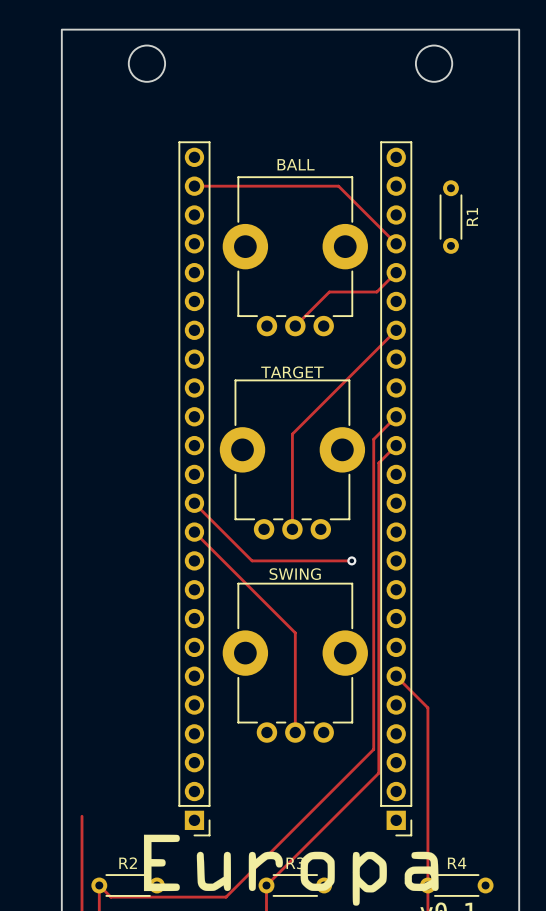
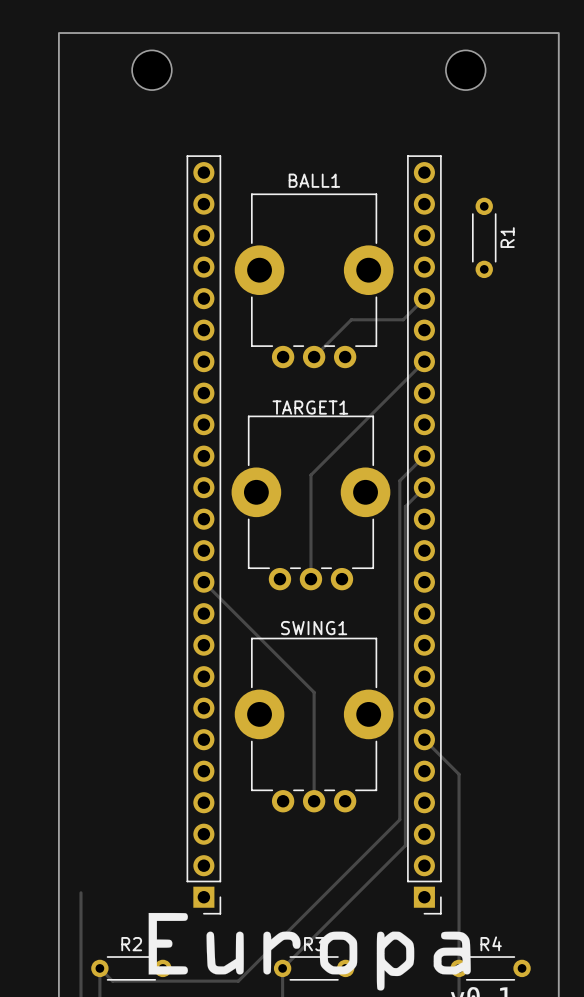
BALL name: BALL (296, 164) -> BALL1 (314, 180)
track: (194, 186) (338, 186) (396, 243) -> none
TARGET name: TARGET (292, 372) -> TARGET1 (310, 407)
track: (194, 503) (252, 560) (351, 560) -> none
via: (351, 560) -> none
SWING name: SWING (295, 574) -> SWING1 (314, 628)

